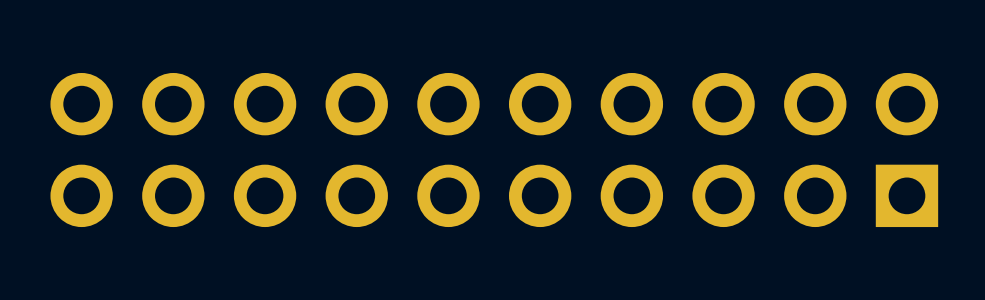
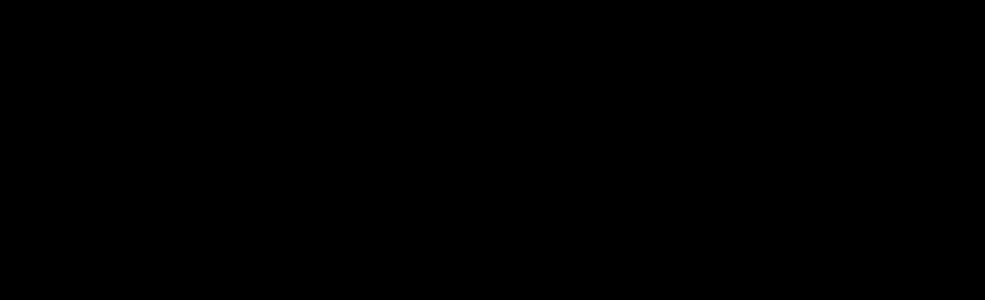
part: (494, 150) -> none

